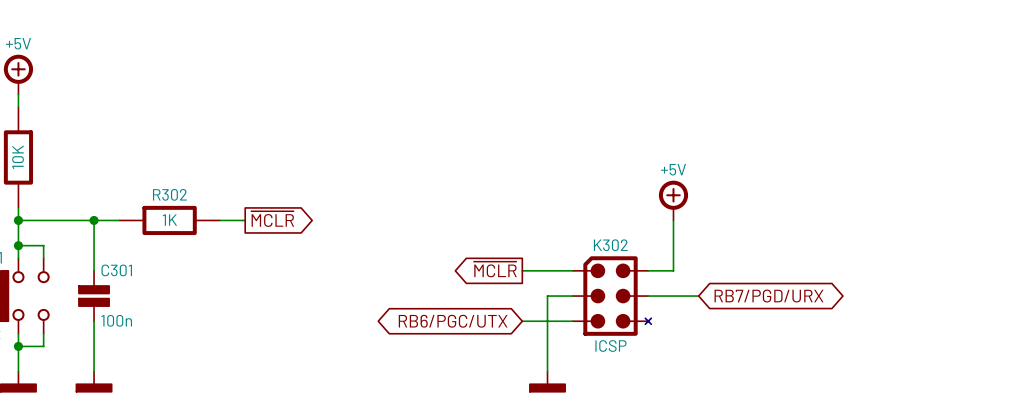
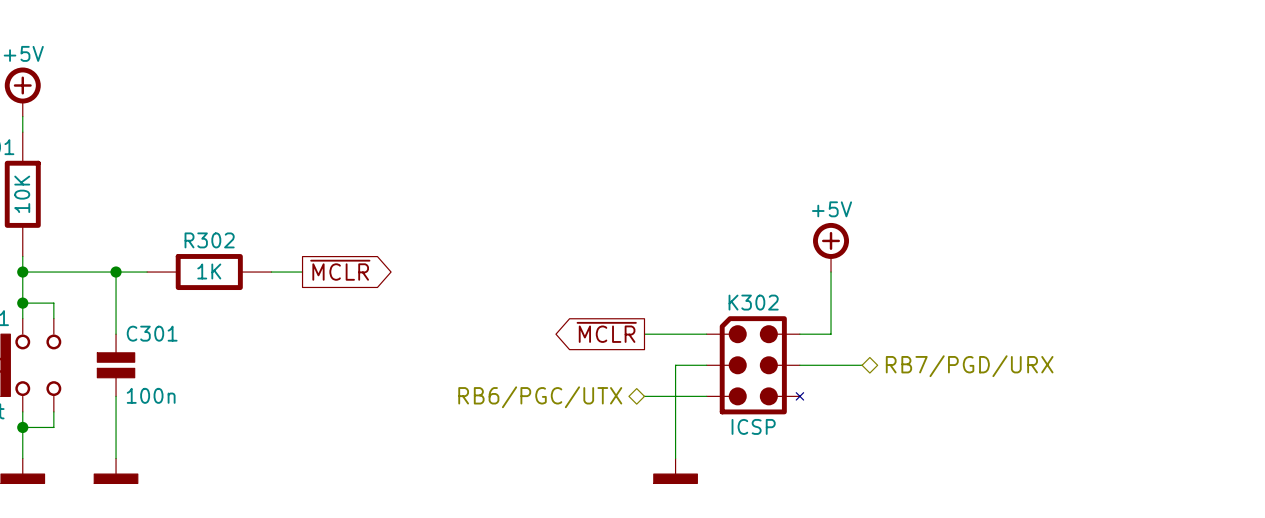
hierarchical label: none -> RB7/PGD/URX (969, 366)
global label: RB7/PGD/URX (769, 296) -> none
hierarchical label: none -> RB6/PGC/UTX (540, 397)
global label: RB6/PGC/UTX (453, 321) -> none

